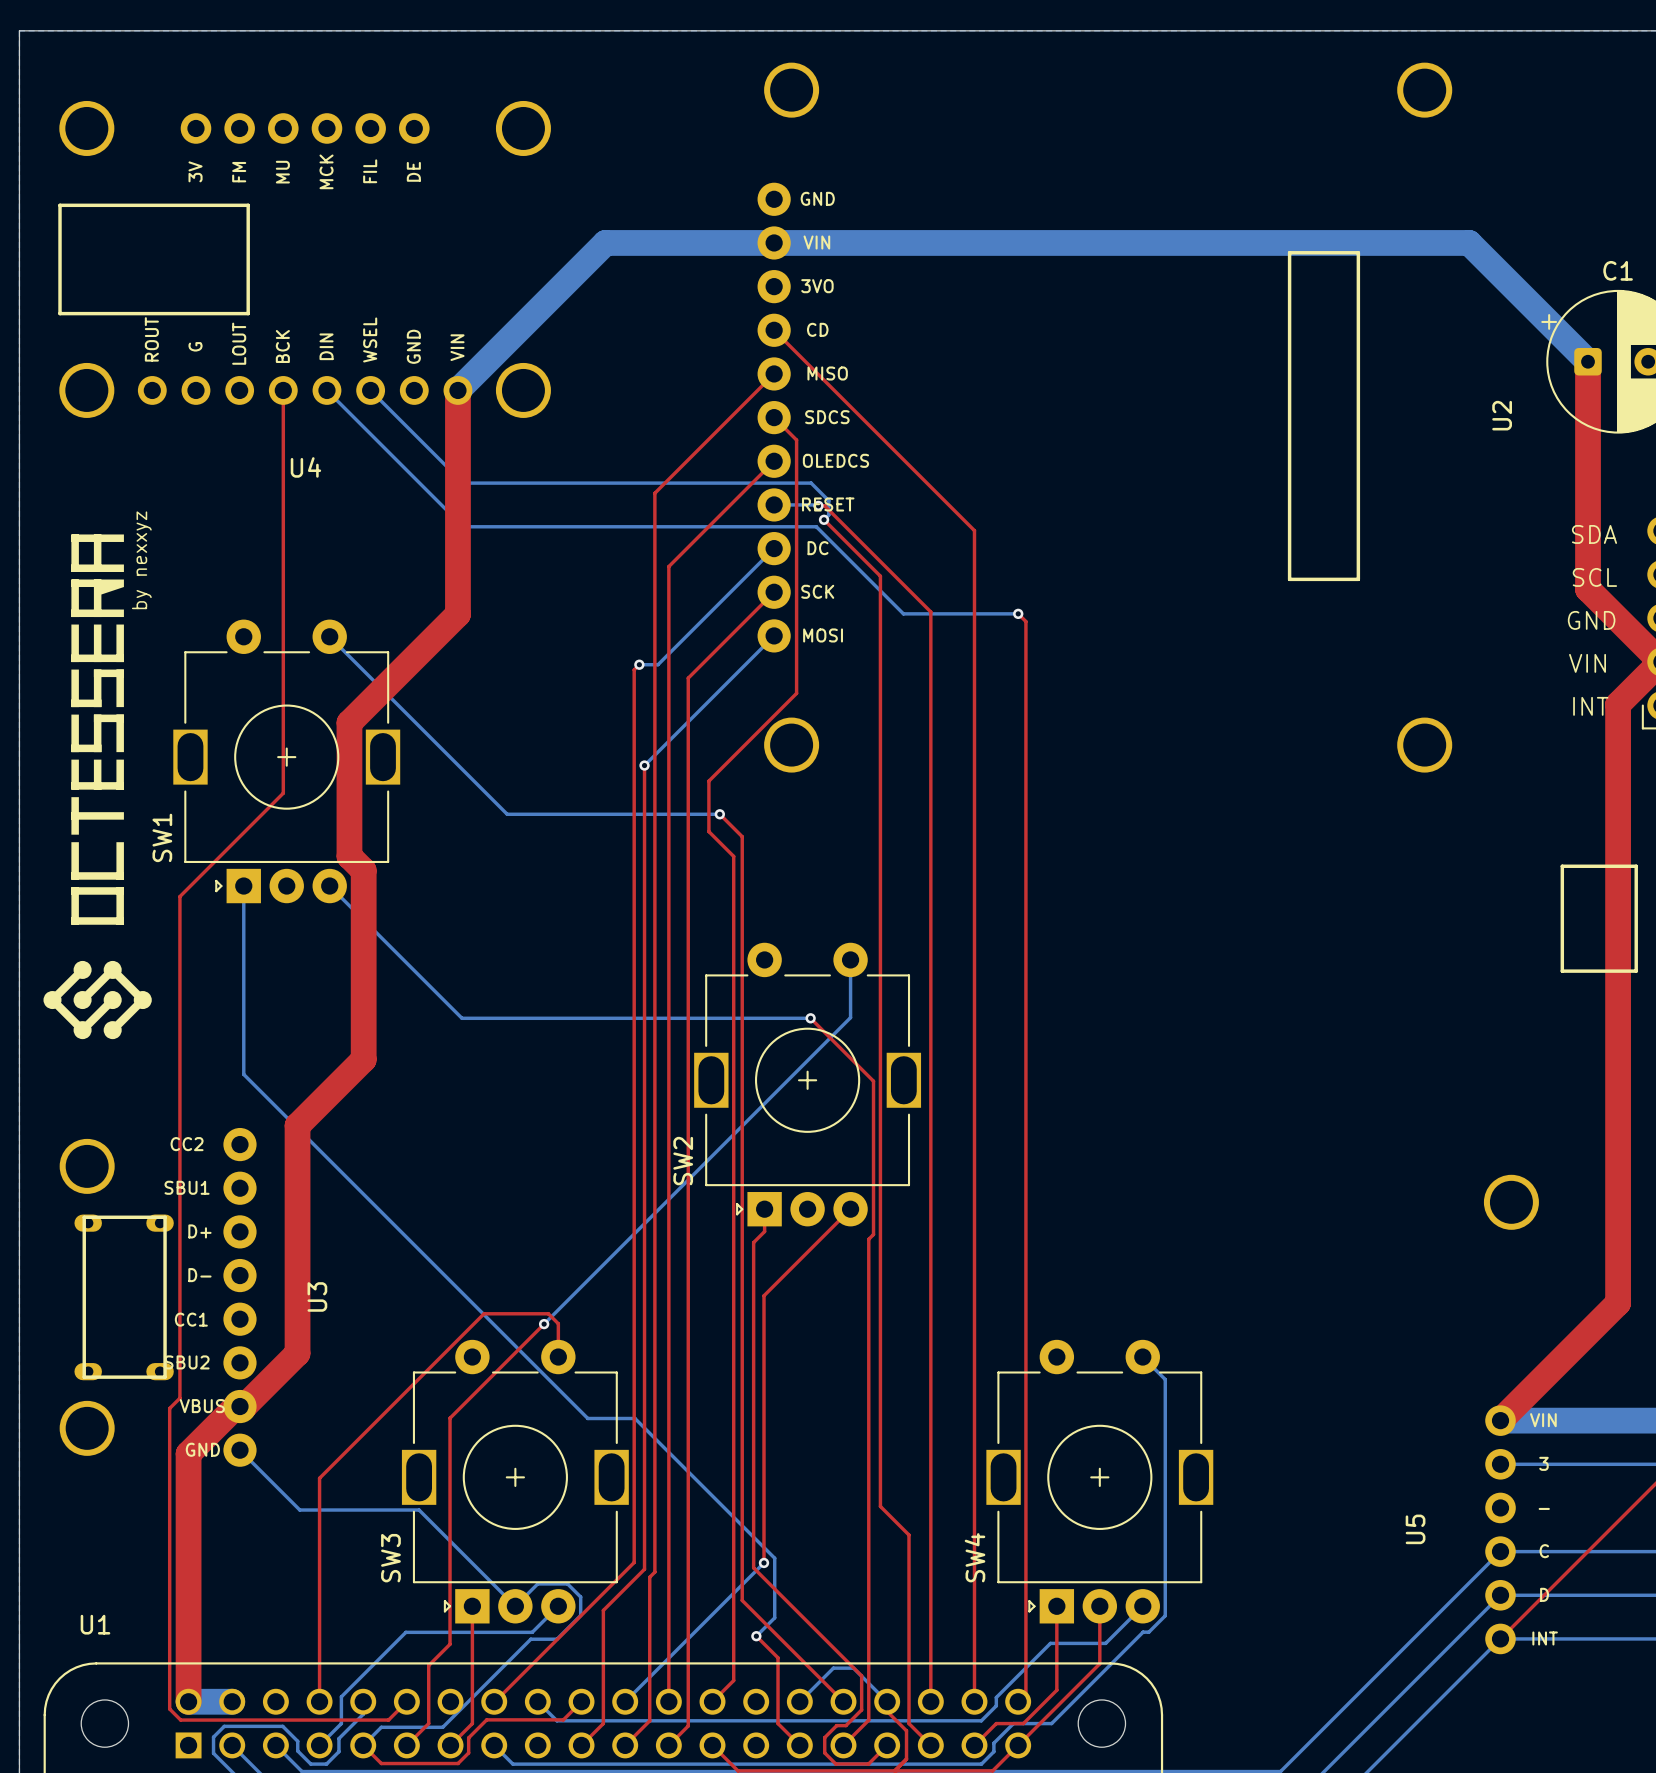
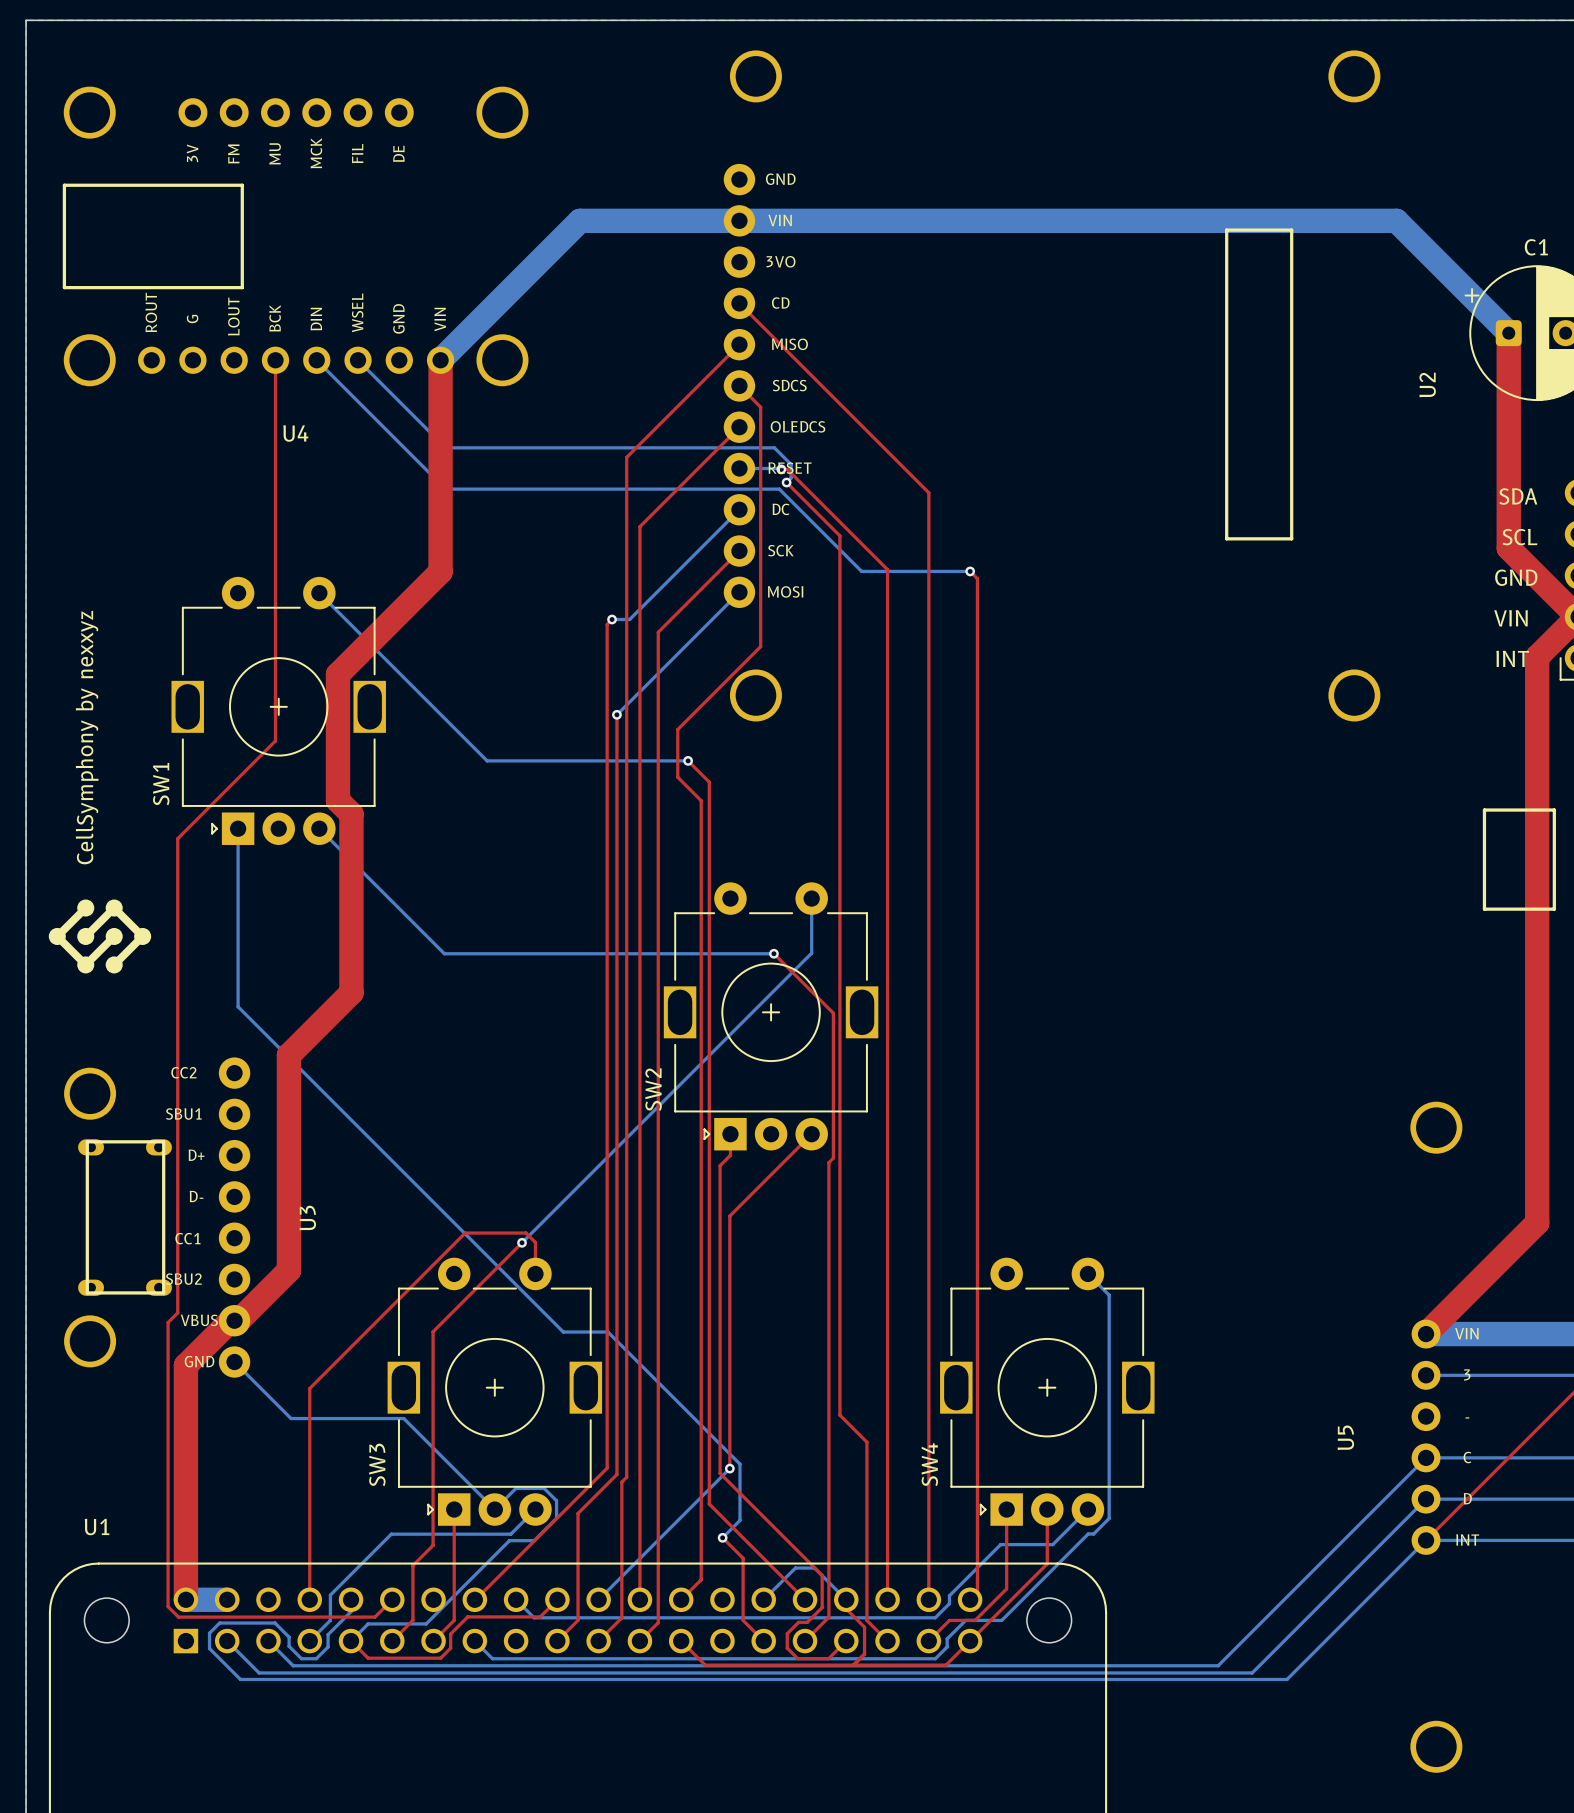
drawing: [71, 534, 124, 925] -> none
text: by nexxyz (141, 560) -> none
text: none -> CellSymphony by nexxyz (87, 737)

